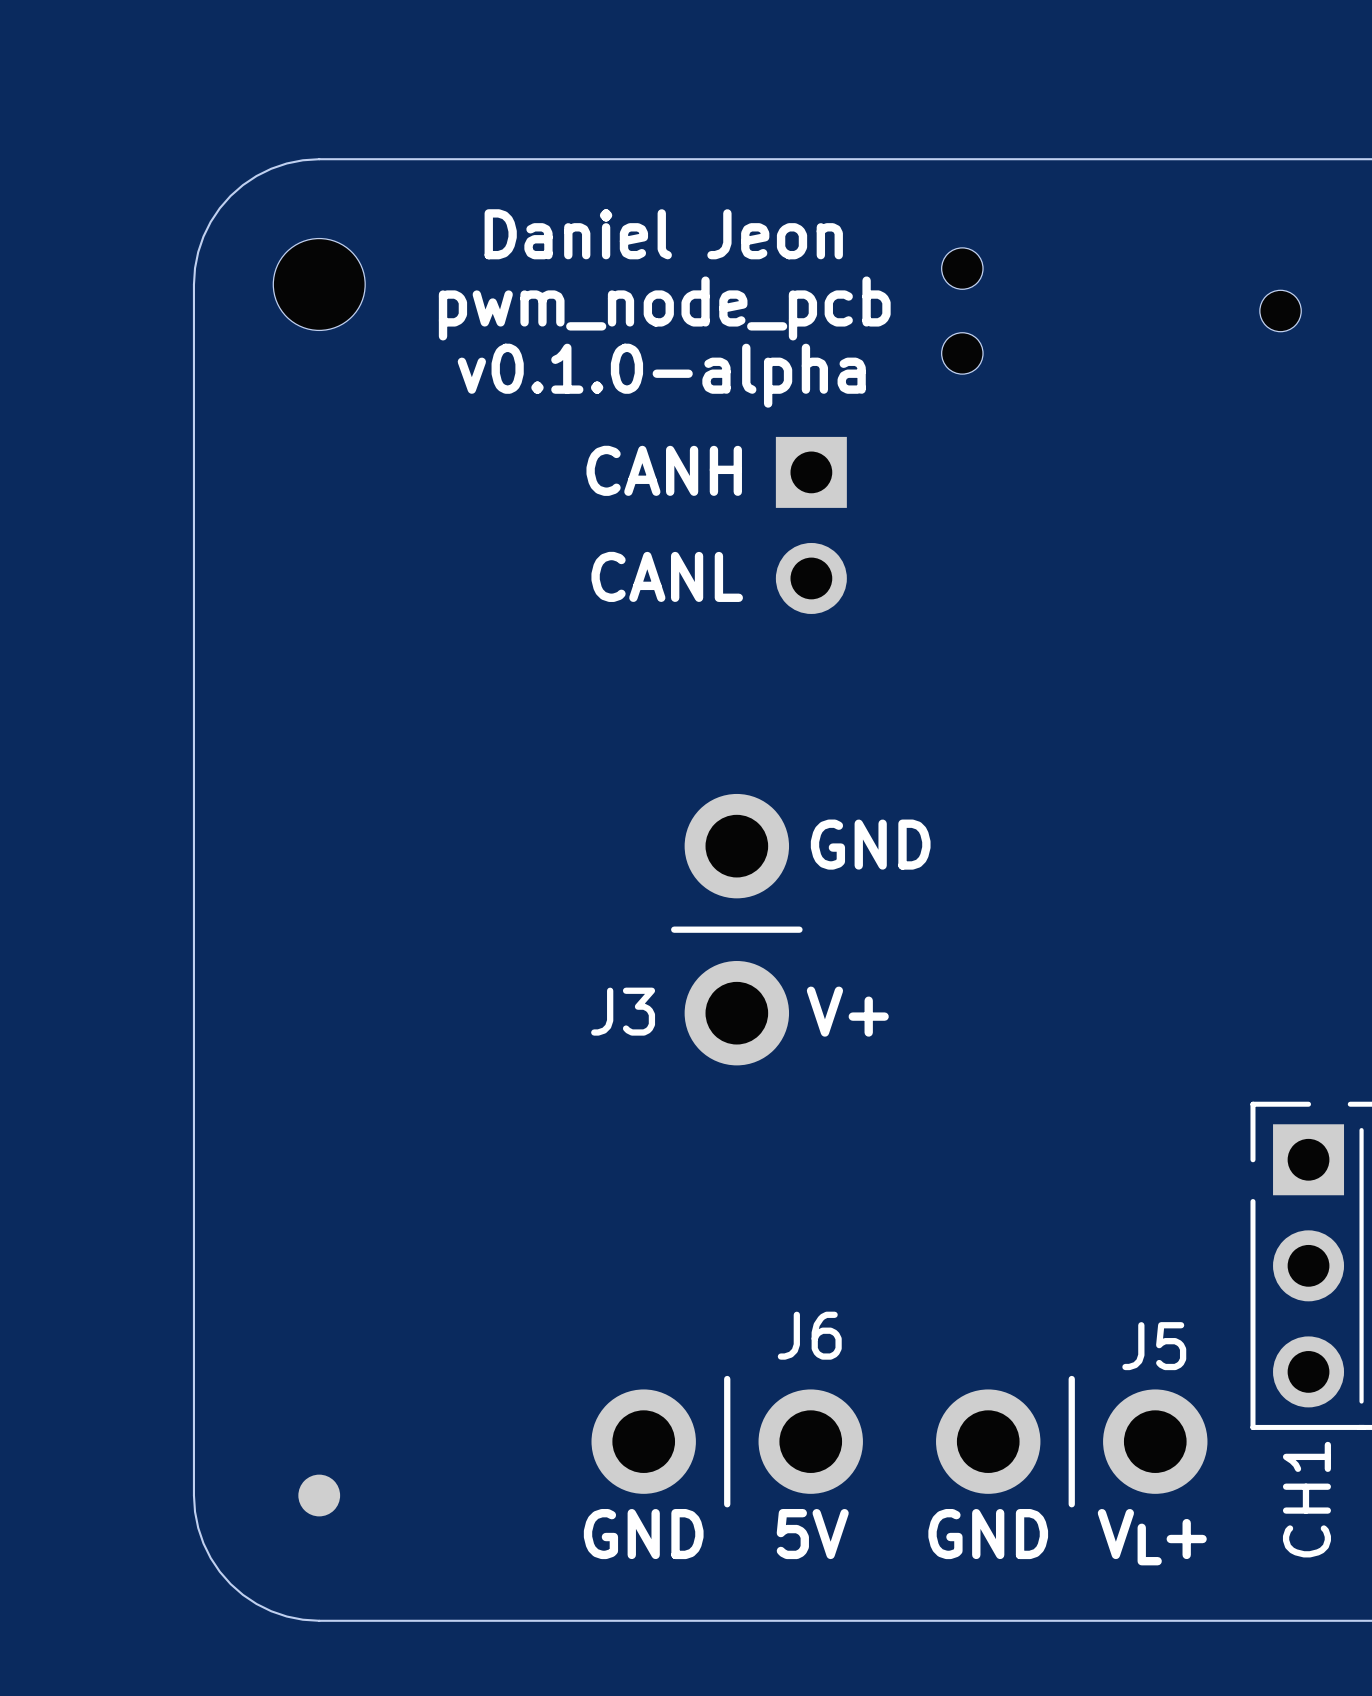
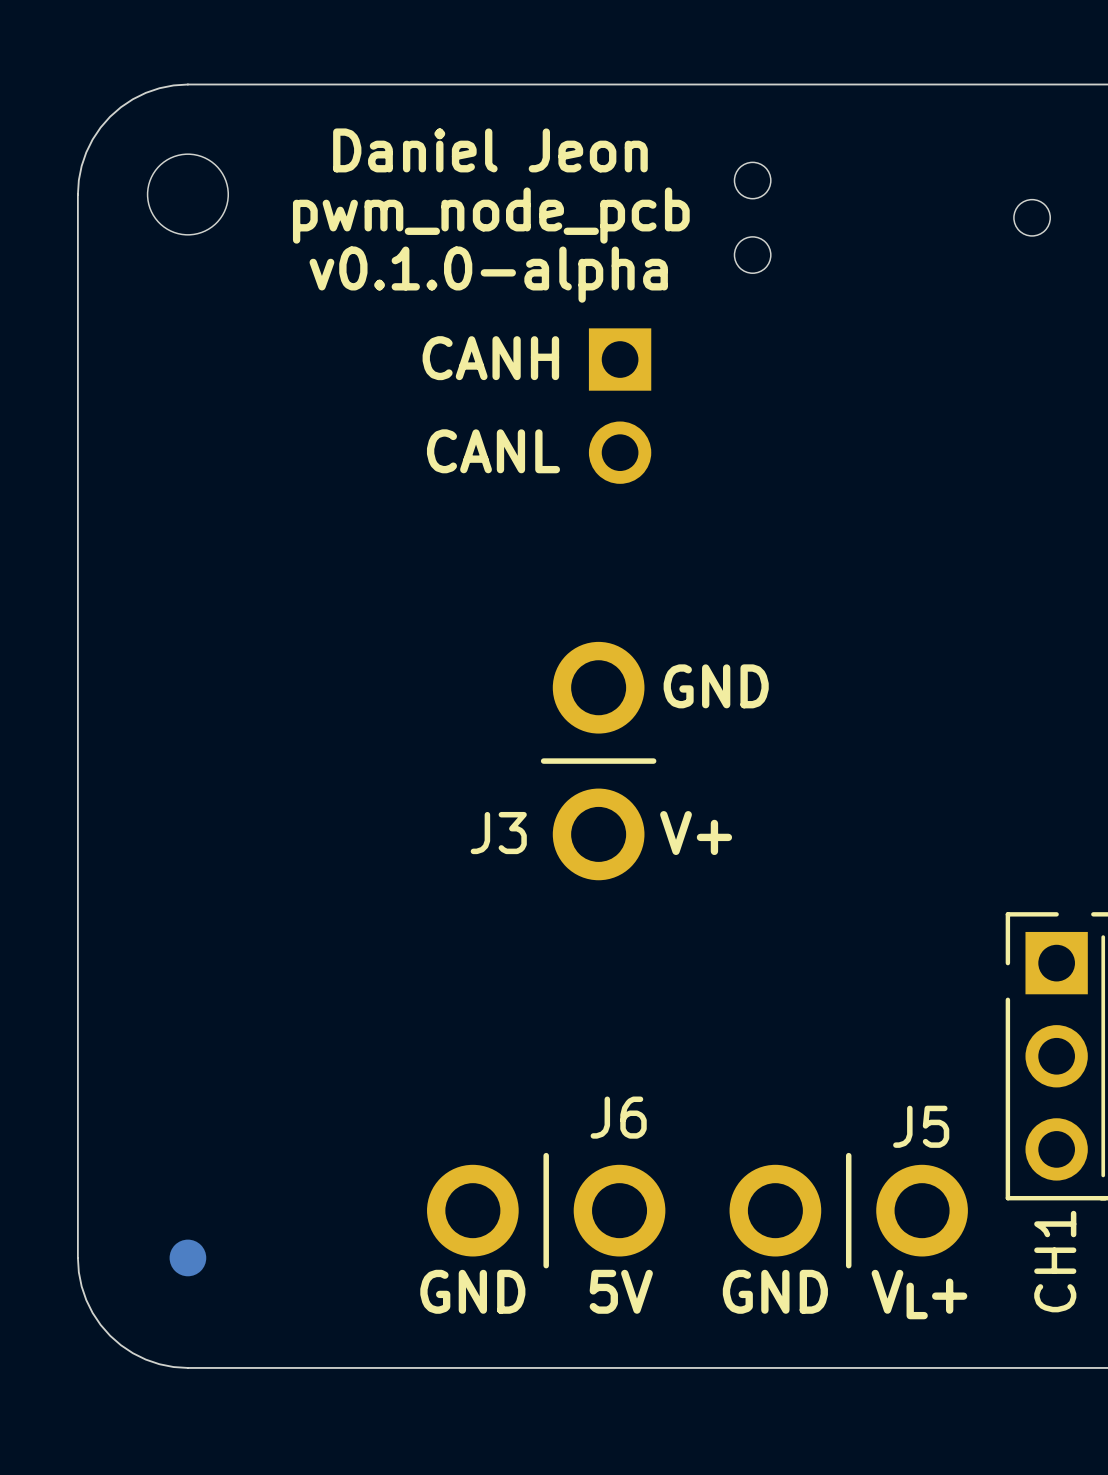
text position: GND (870, 844) -> GND (716, 686)
line: (724, 929) (674, 929) -> (653, 761) (609, 761)
J3 position: (736, 929) -> (598, 761)
text position: V+ (847, 1011) -> V+ (696, 833)

